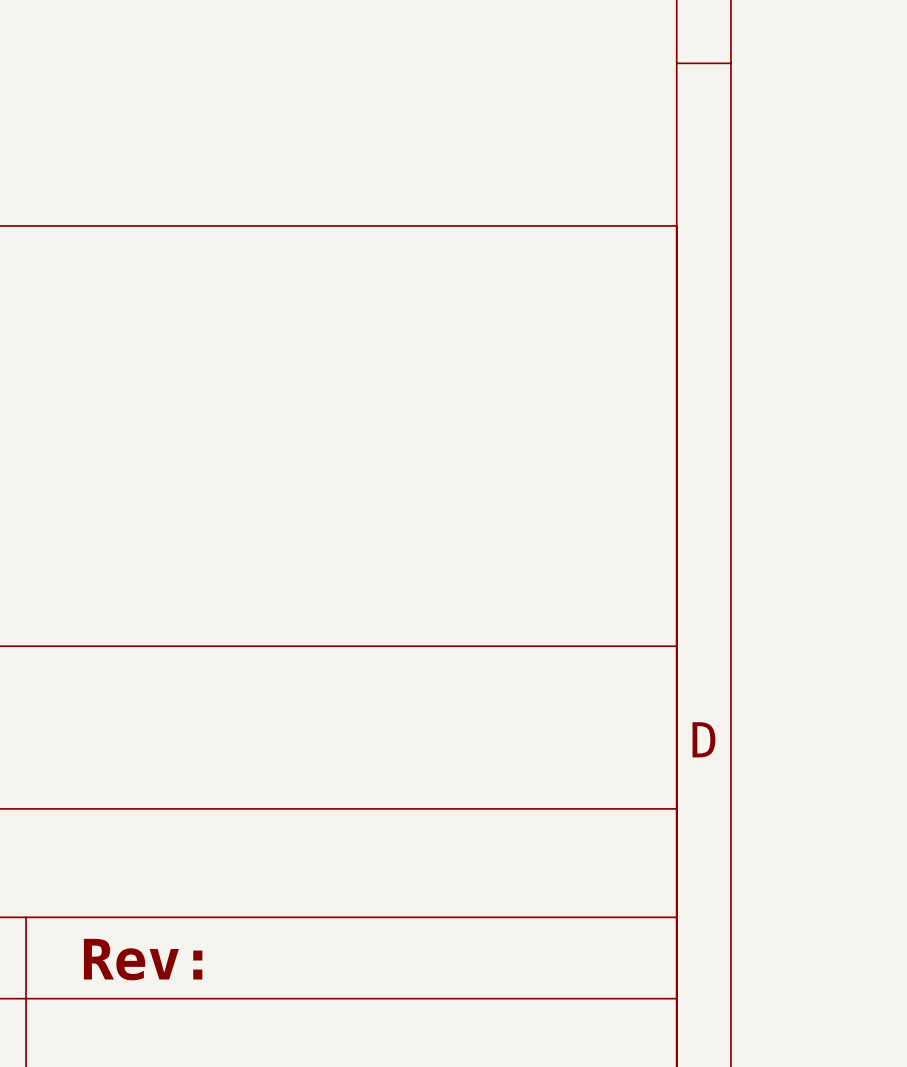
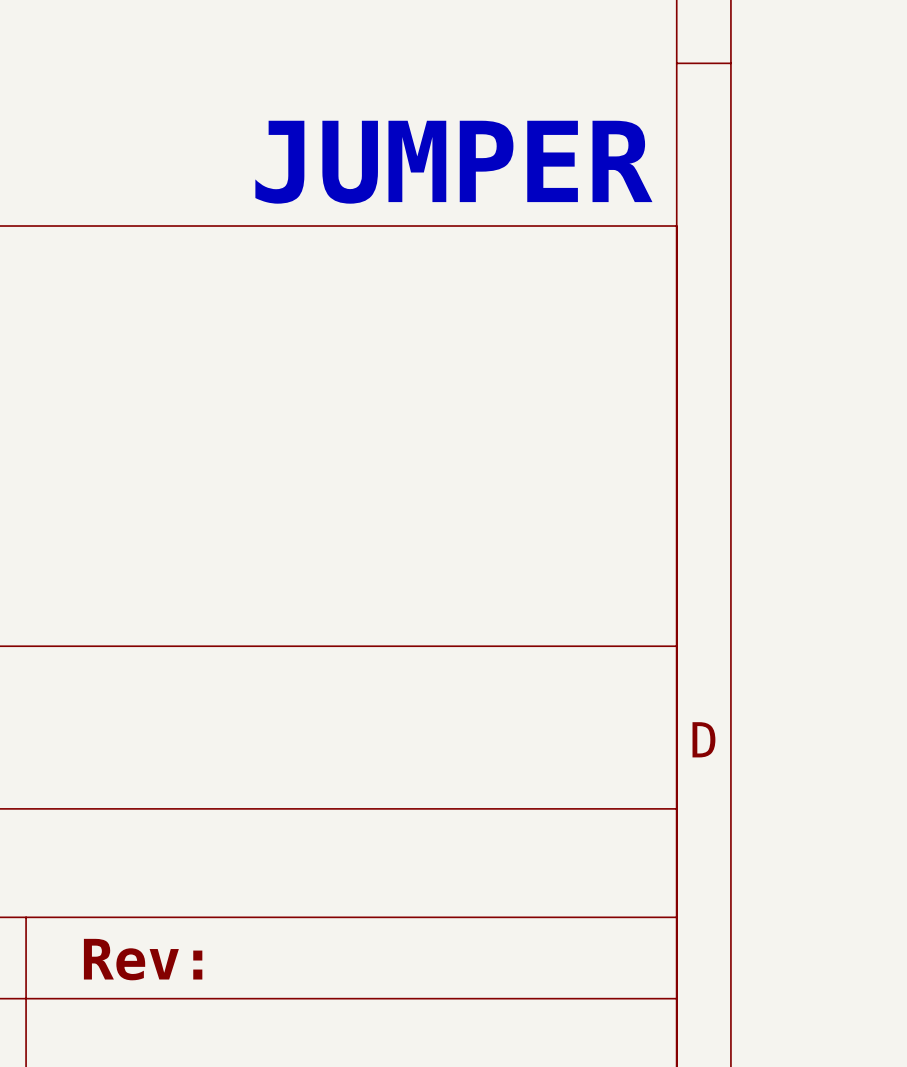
text: none -> JUMPER (453, 162)

